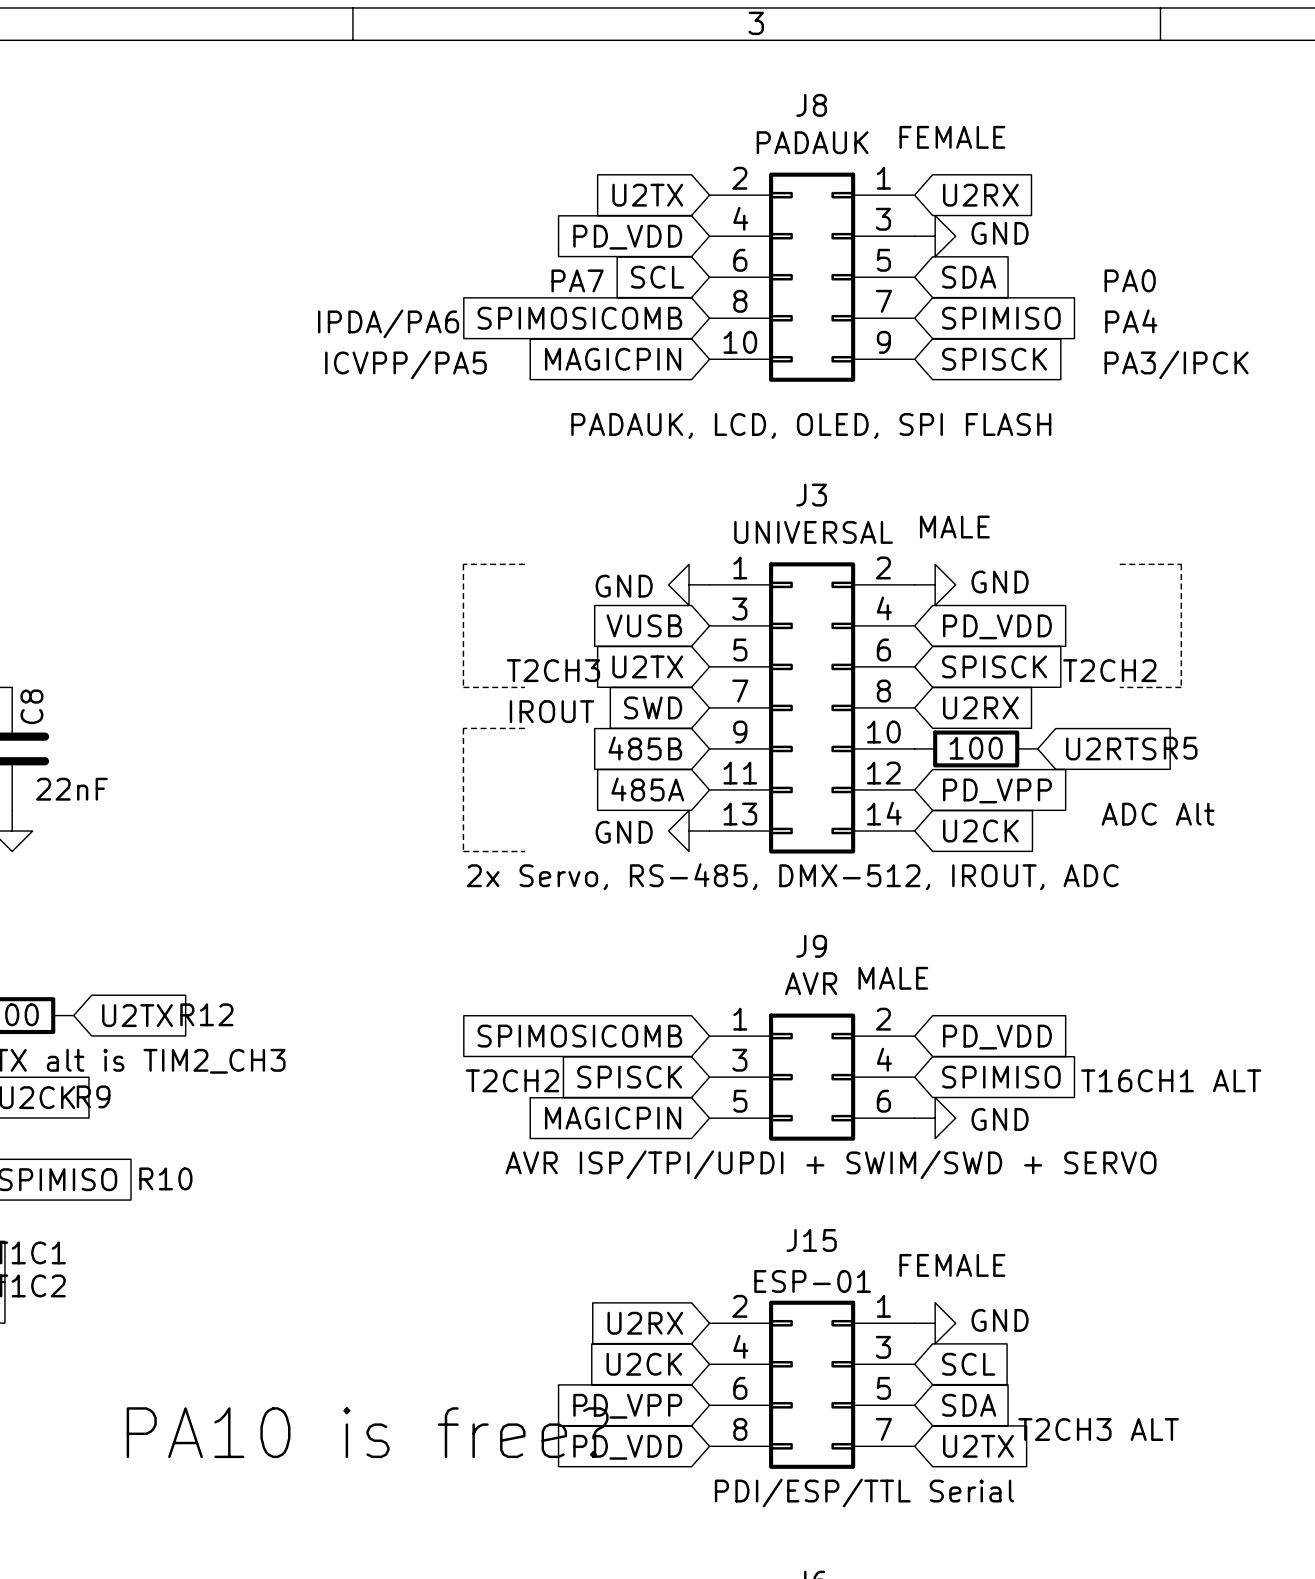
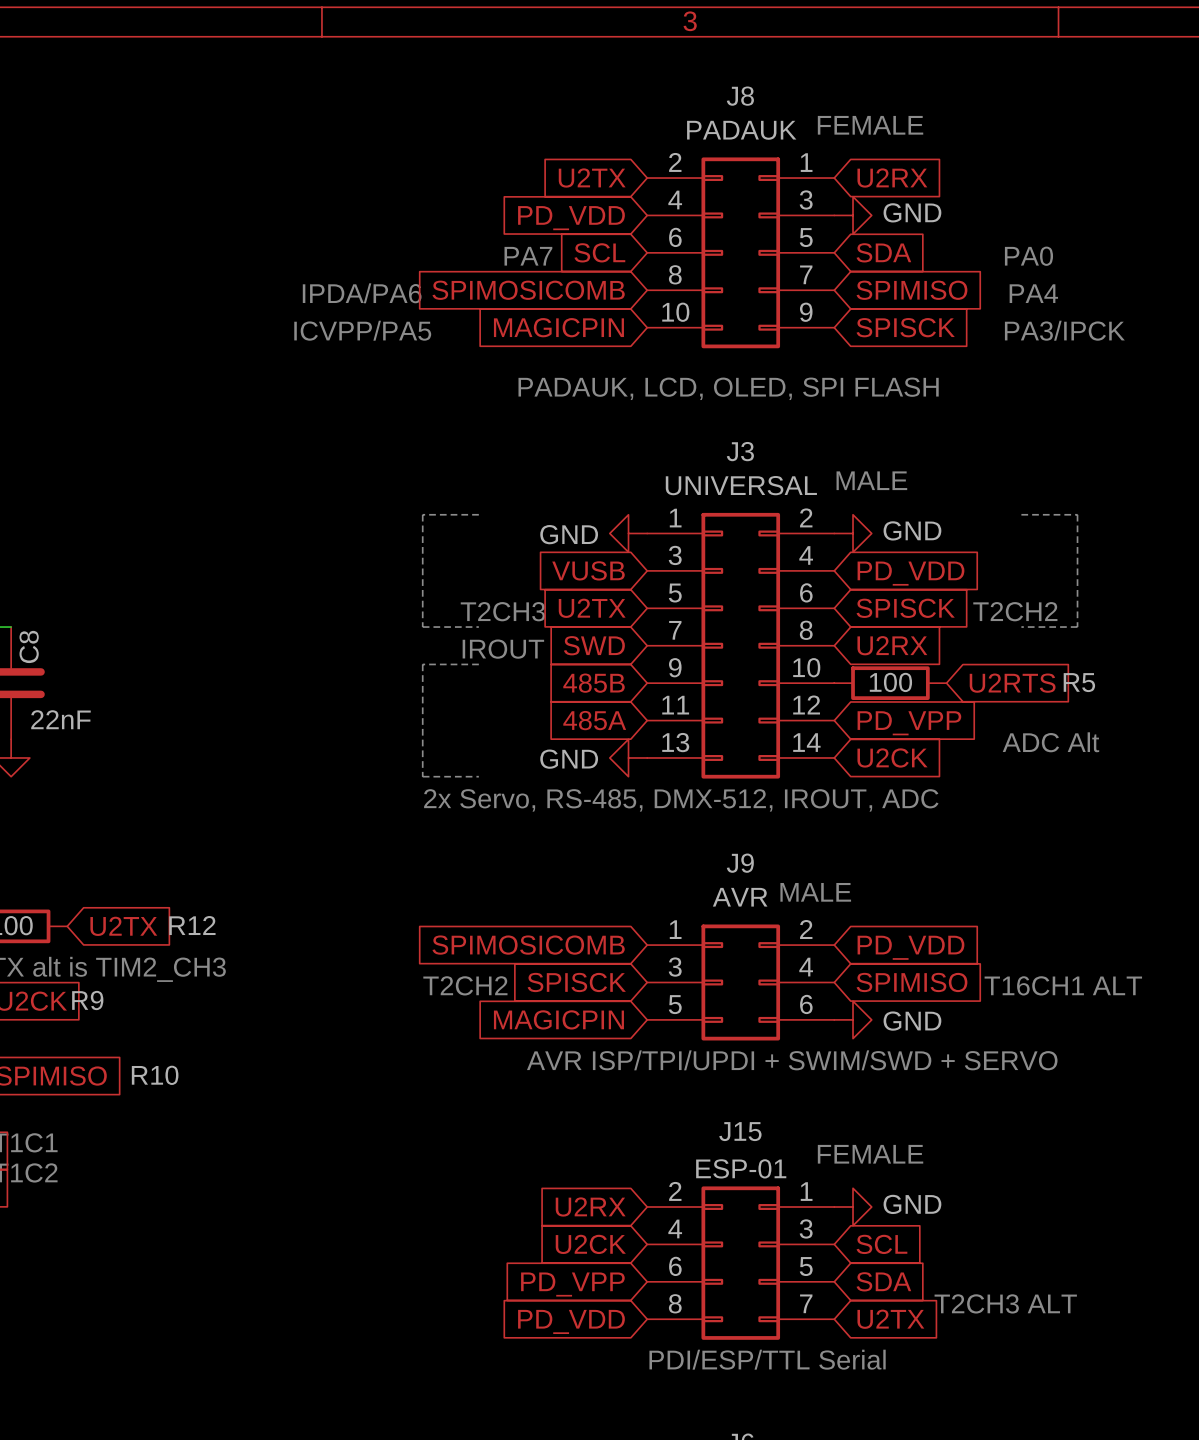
text: PA10 is free? (367, 1432) -> none

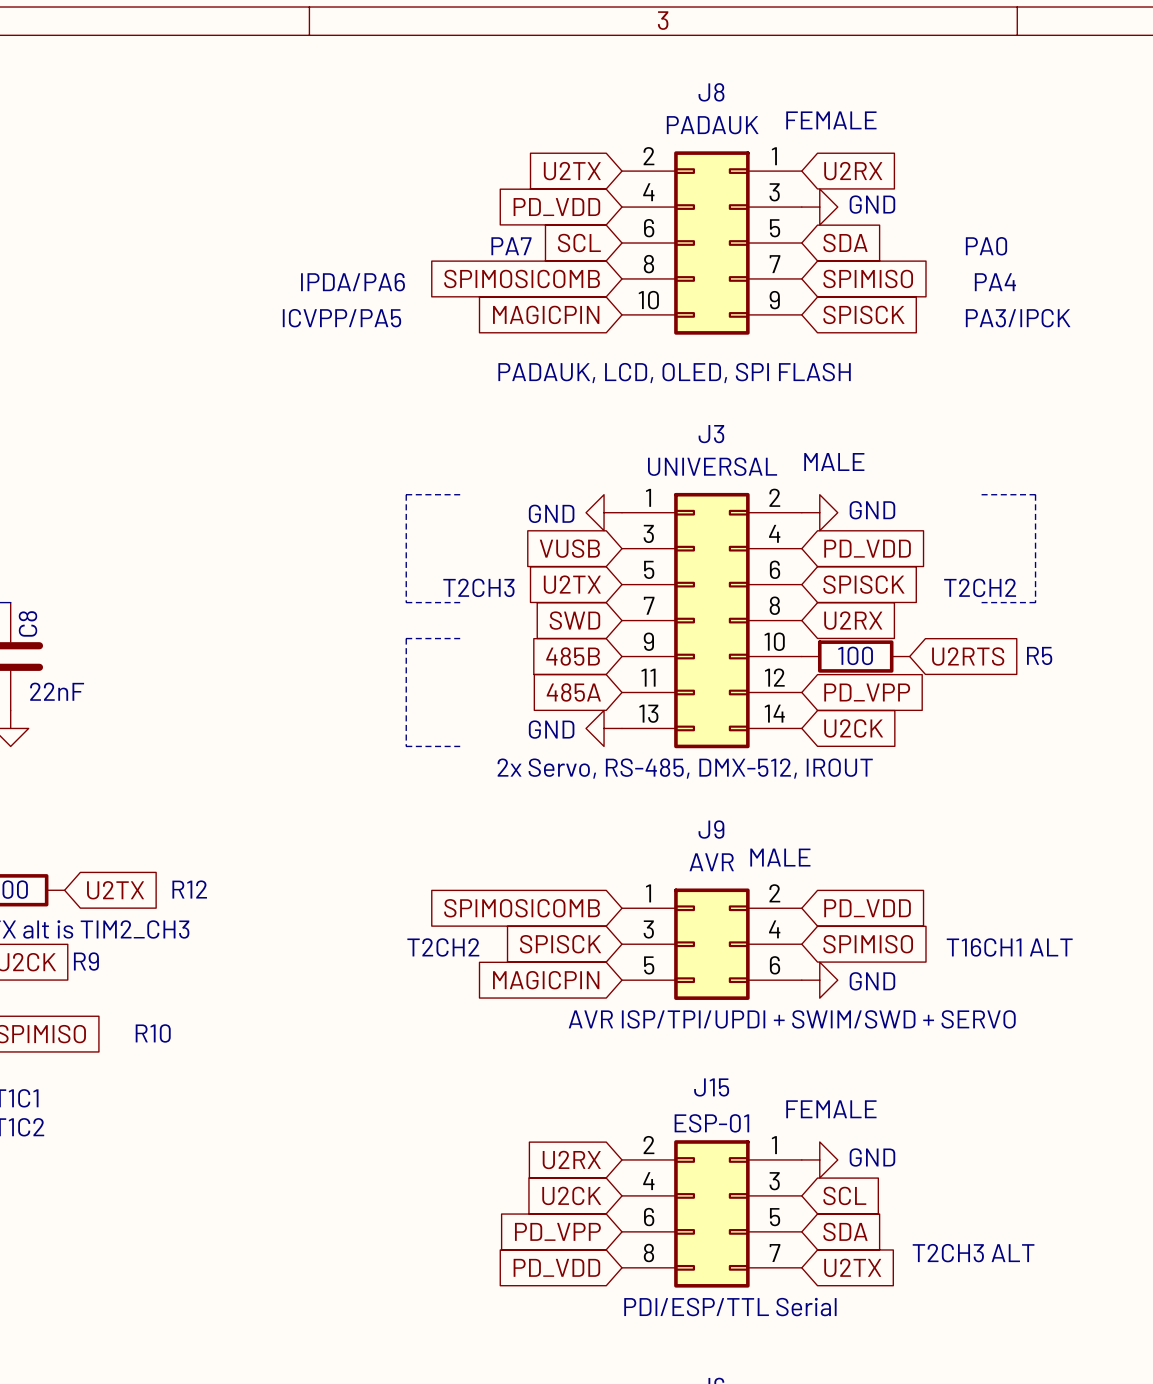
text: IROUT (503, 649) -> none
text: ADC Alt (1050, 742) -> none
text: 2x Servo, RS-485, DMX-512, IROUT, ADC (681, 800) -> 2x Servo, RS-485, DMX-512, IROUT (685, 768)

